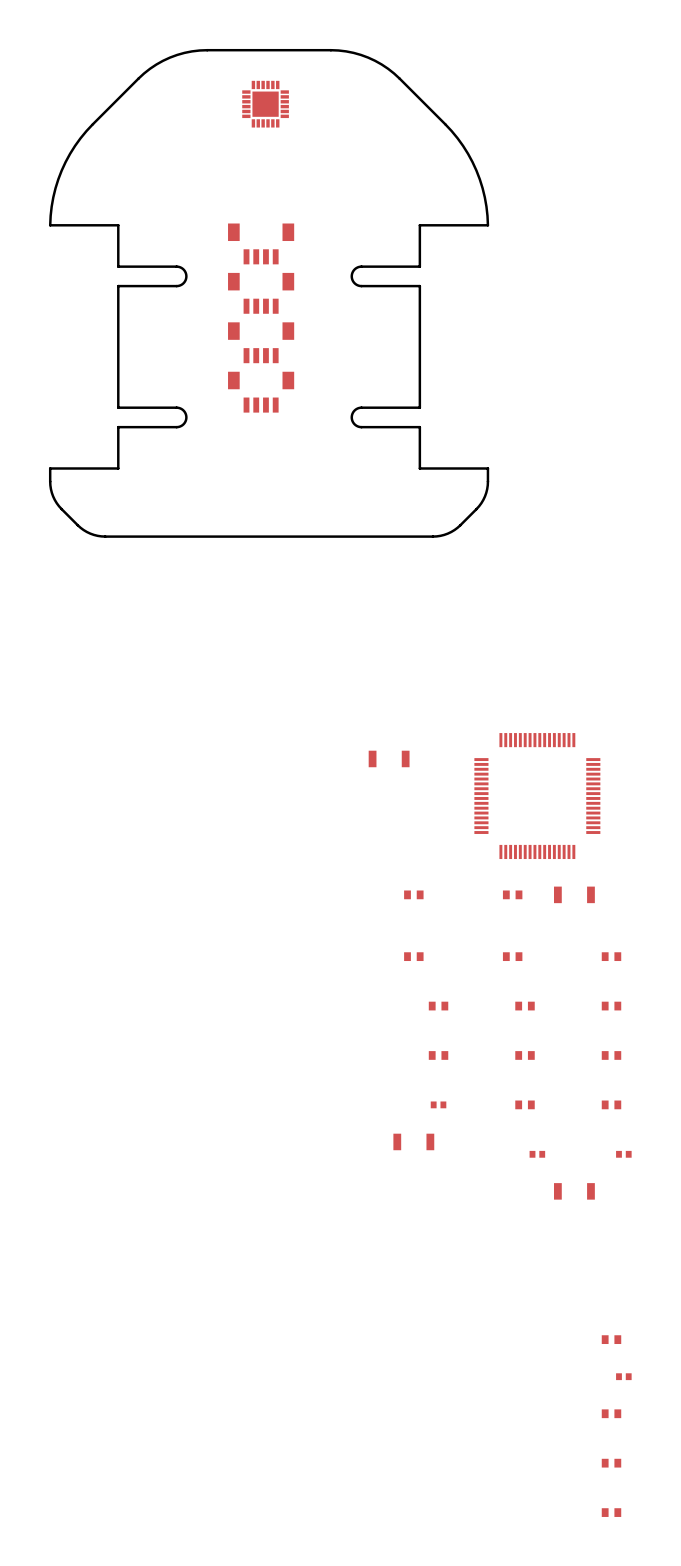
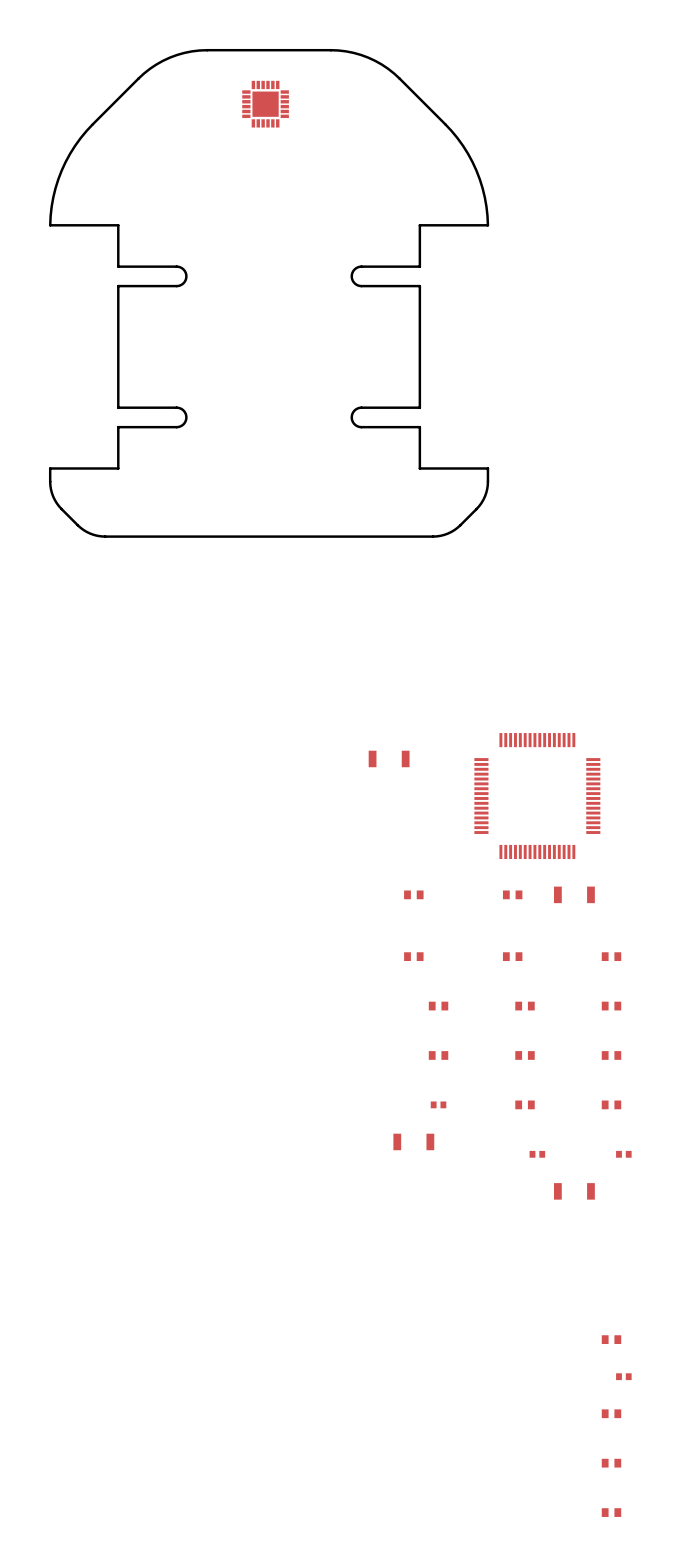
part: (261, 243) -> none
part: (261, 293) -> none
part: (261, 342) -> none
part: (261, 392) -> none

